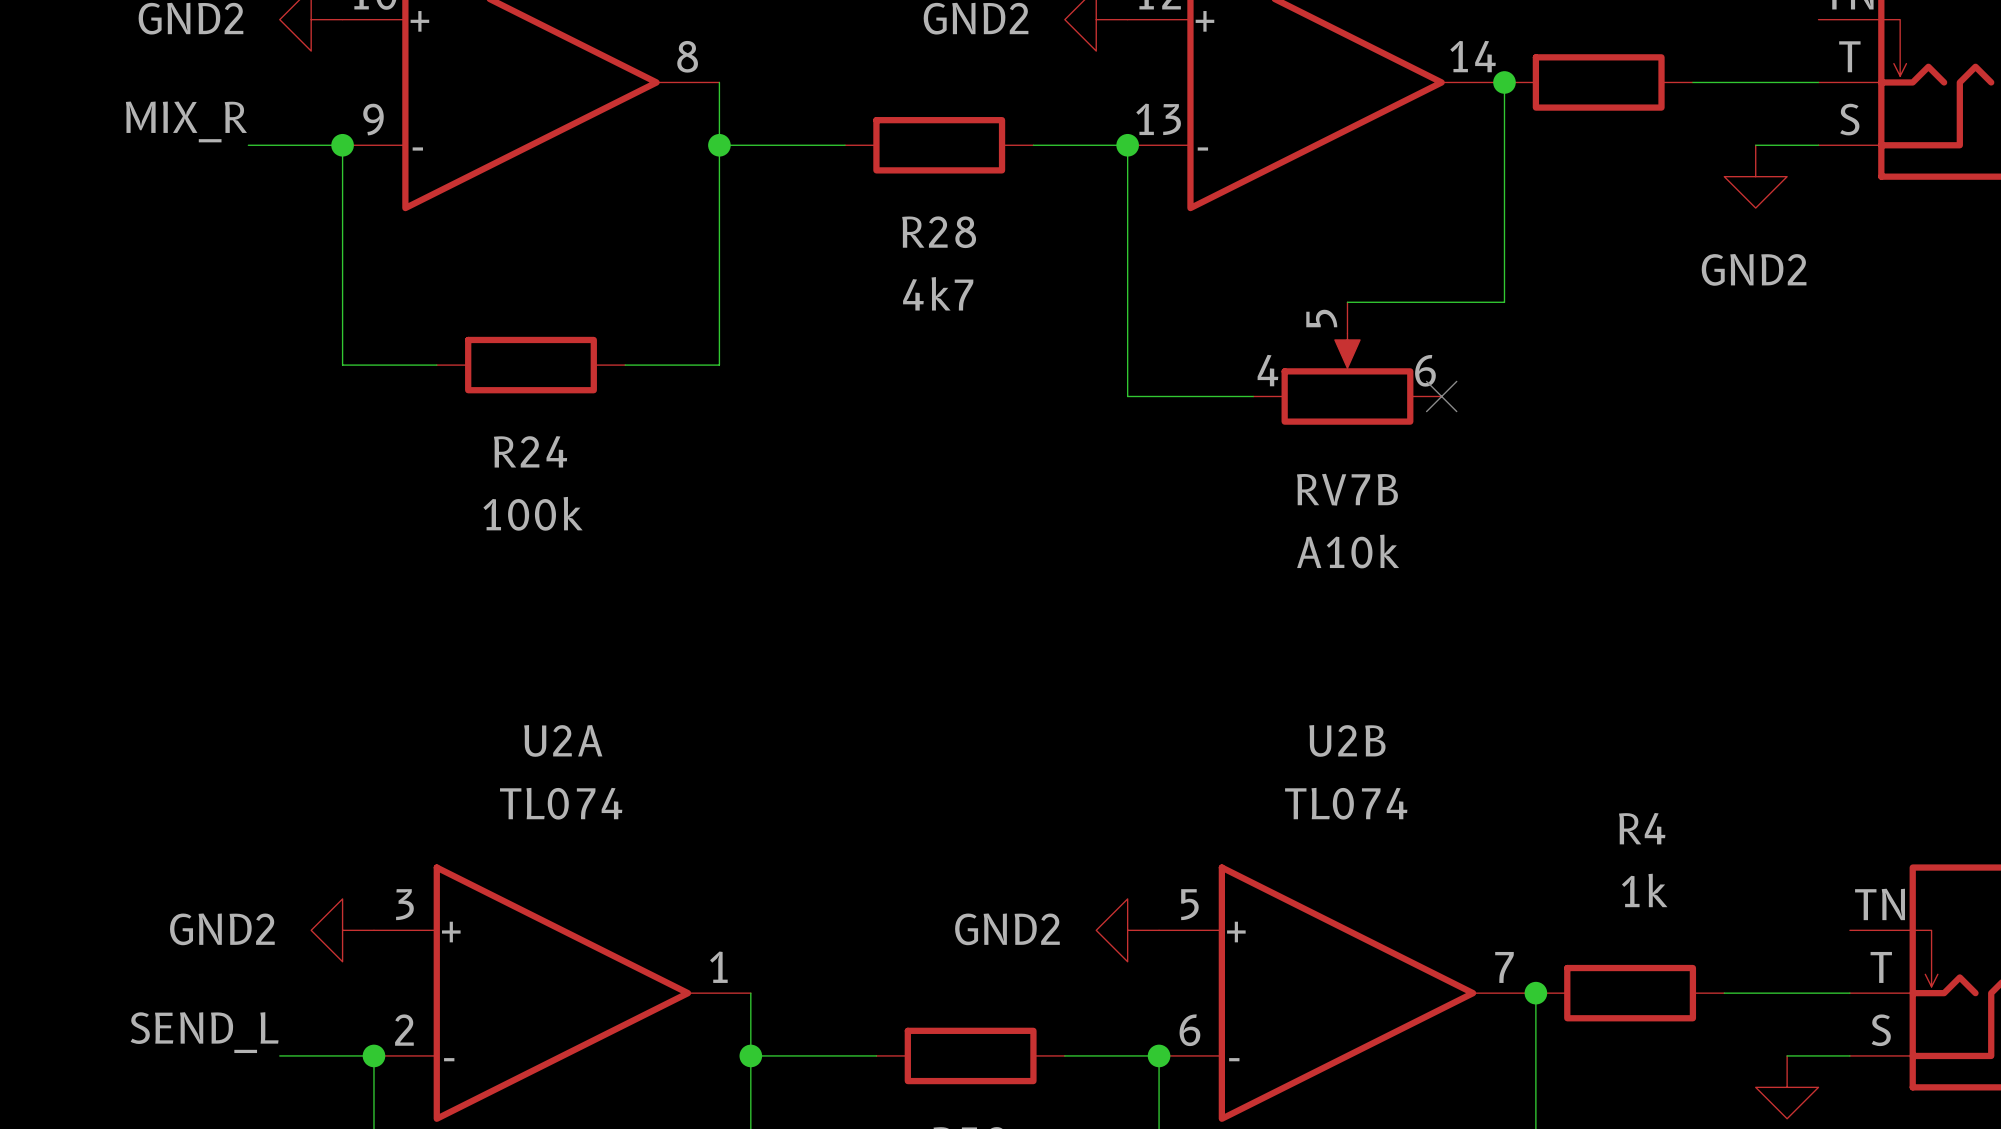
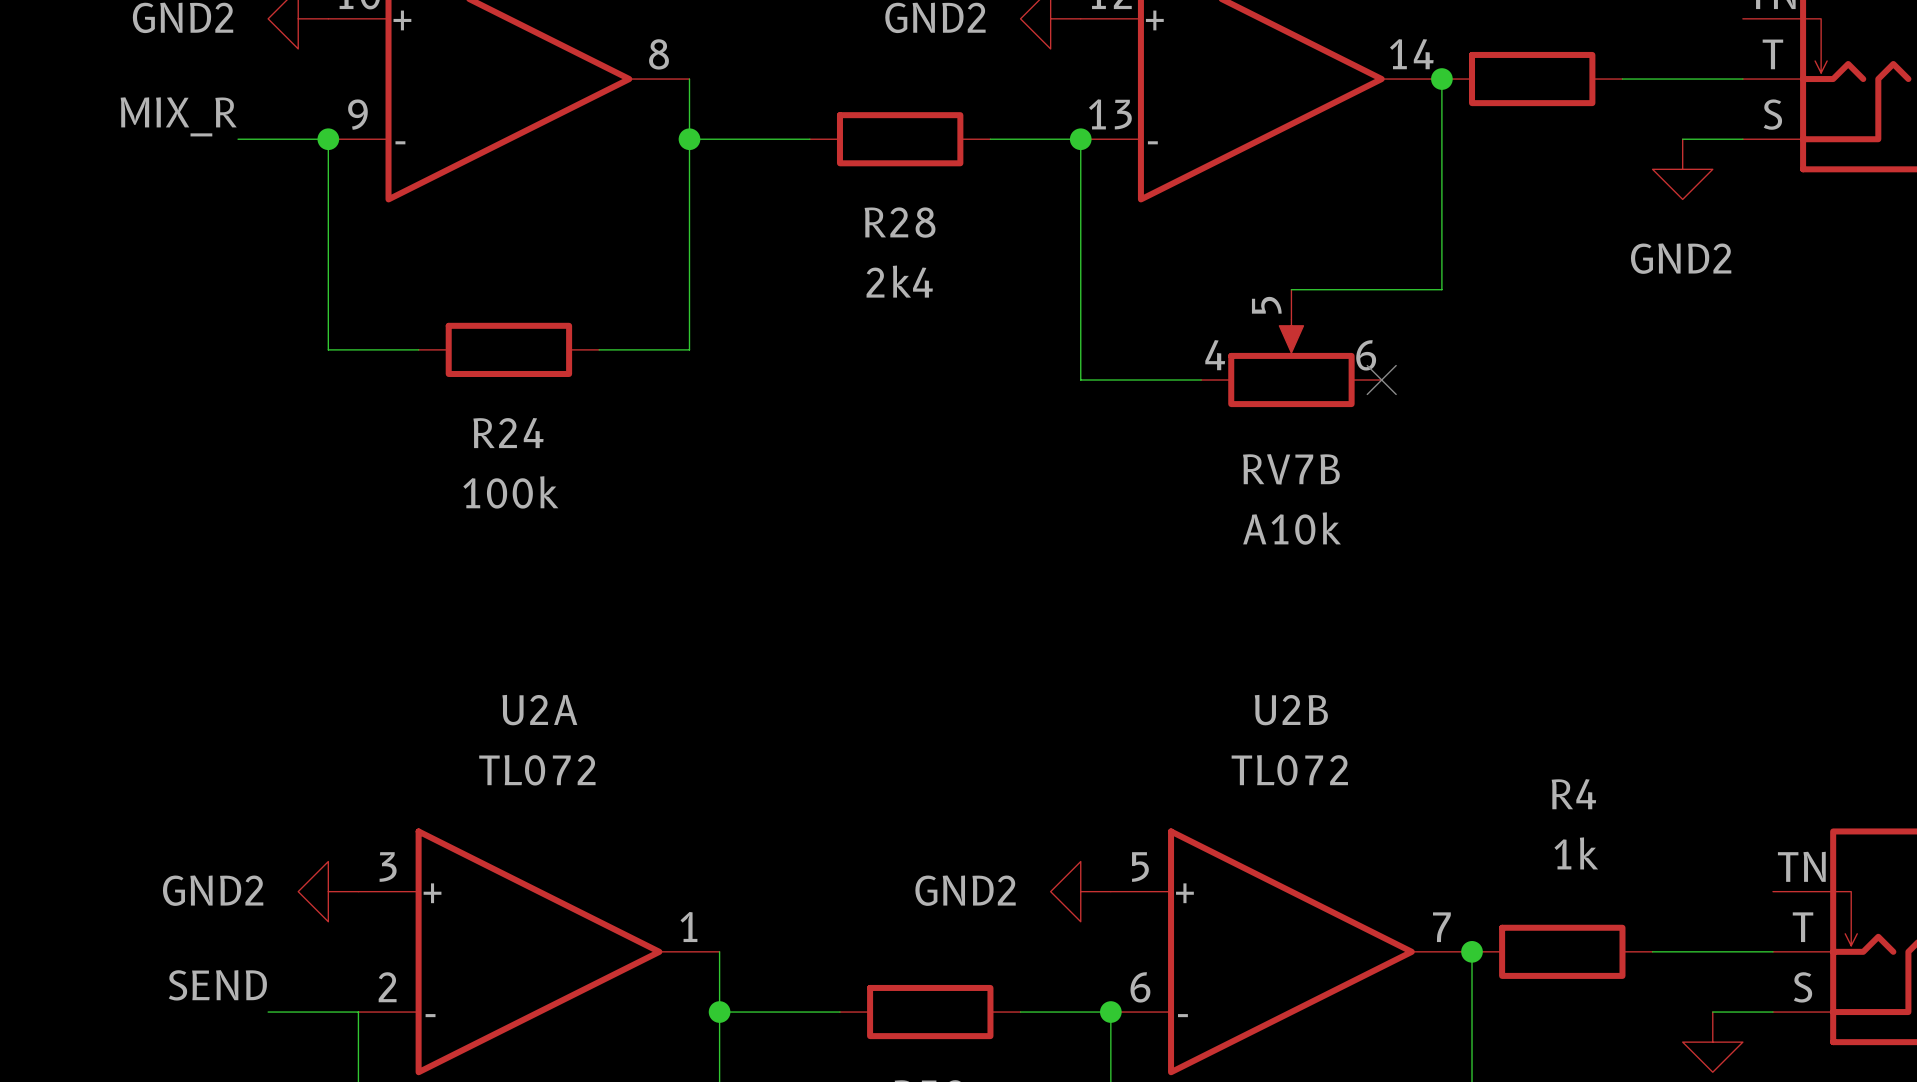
R28 value: 4k7 (938, 293) -> 2k4 (899, 281)
U2A value: TL074 (561, 803) -> TL072 (537, 770)
U2B value: TL074 (1346, 803) -> TL072 (1289, 770)
label: SEND_L (204, 1032) -> SEND (217, 985)
junction: (373, 1055) -> none

